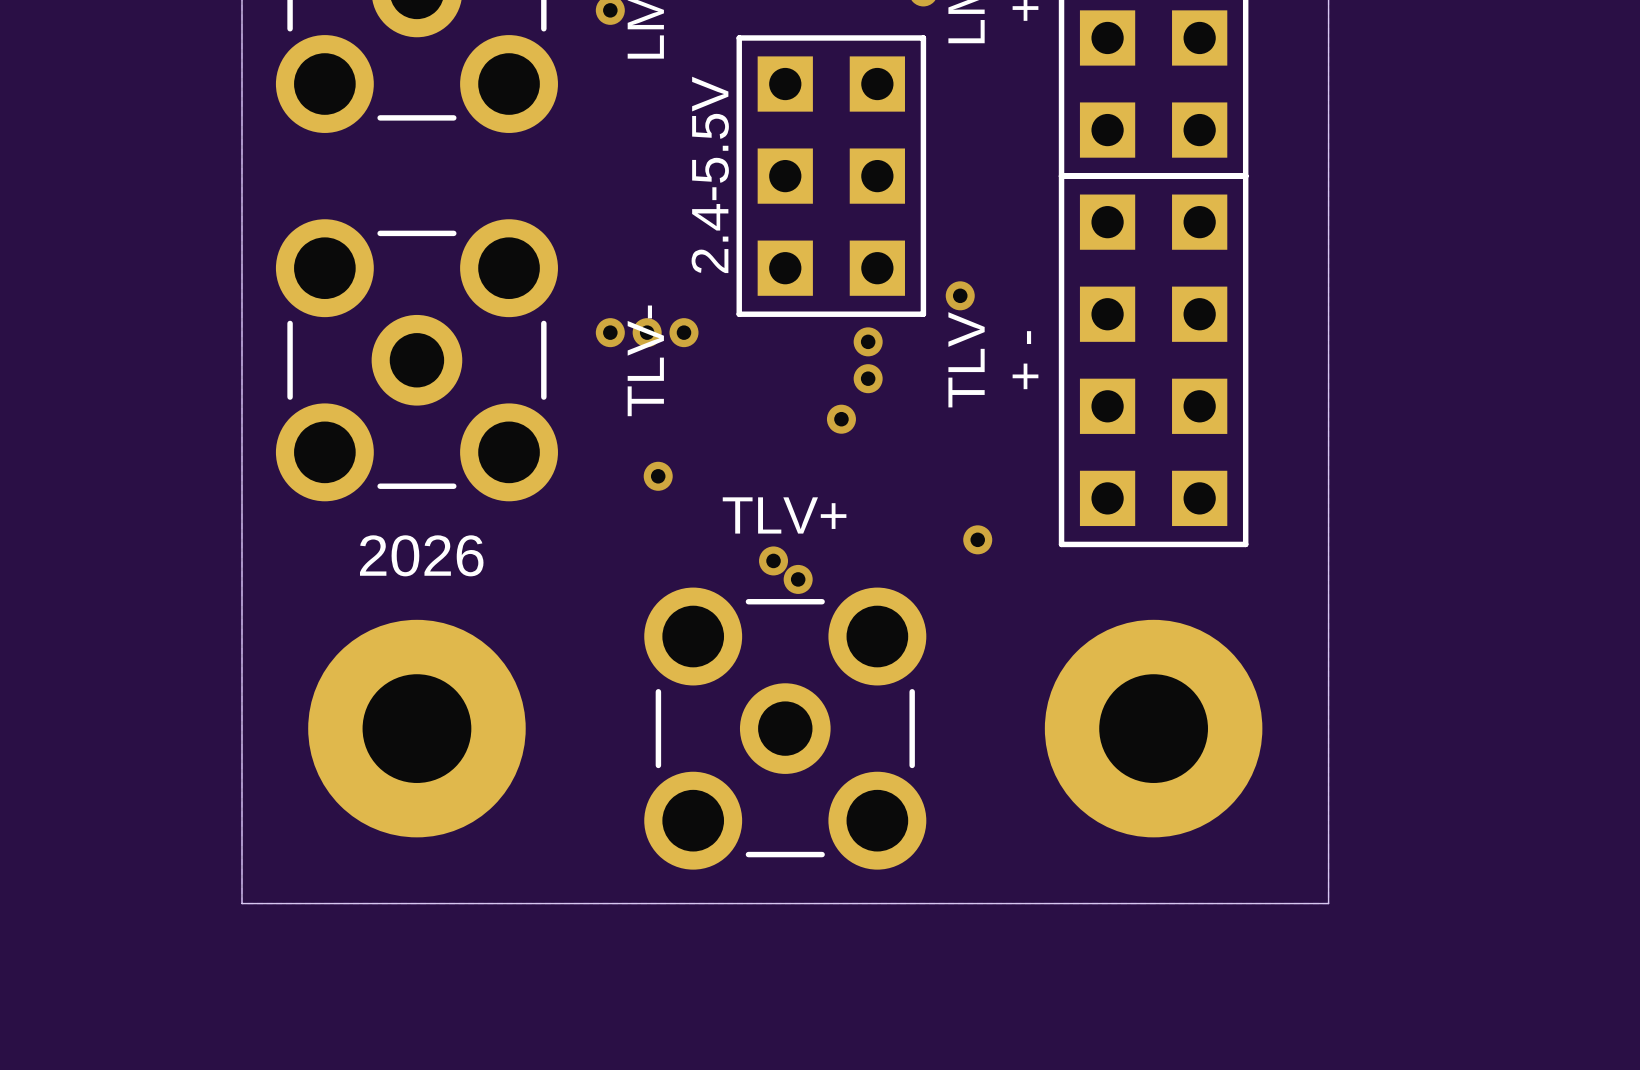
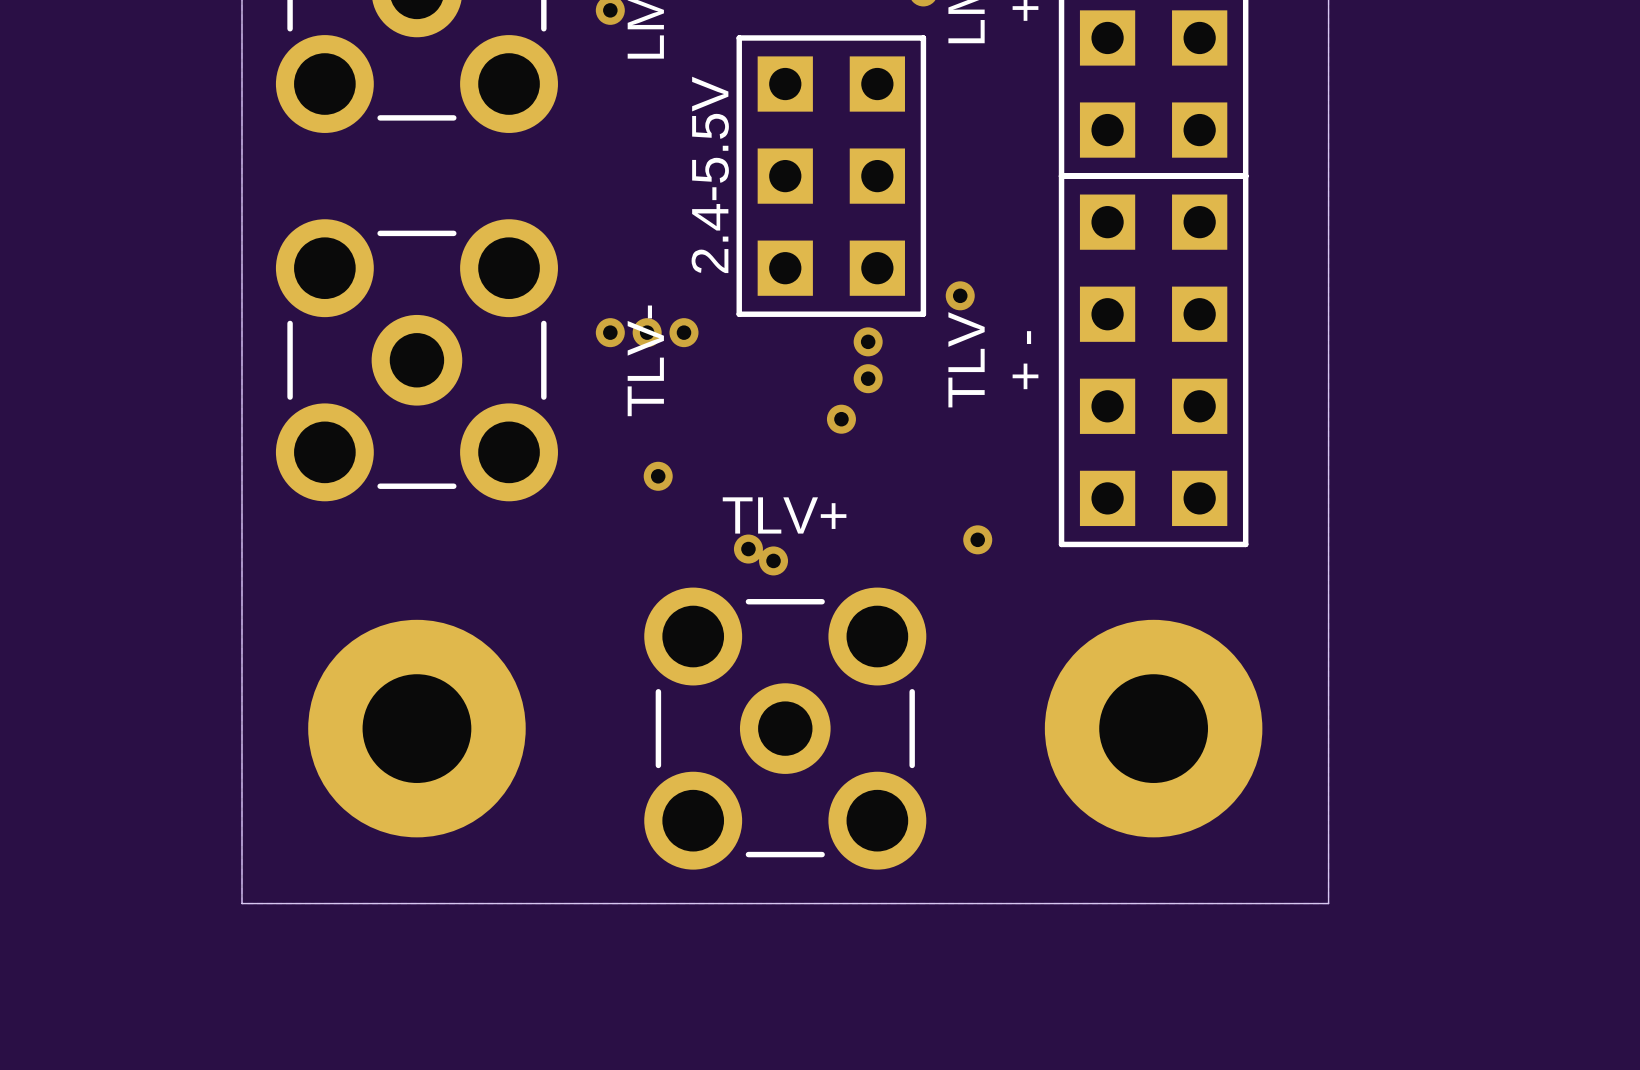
text: 2026 (421, 555) -> none
via position: (798, 579) -> (748, 549)

